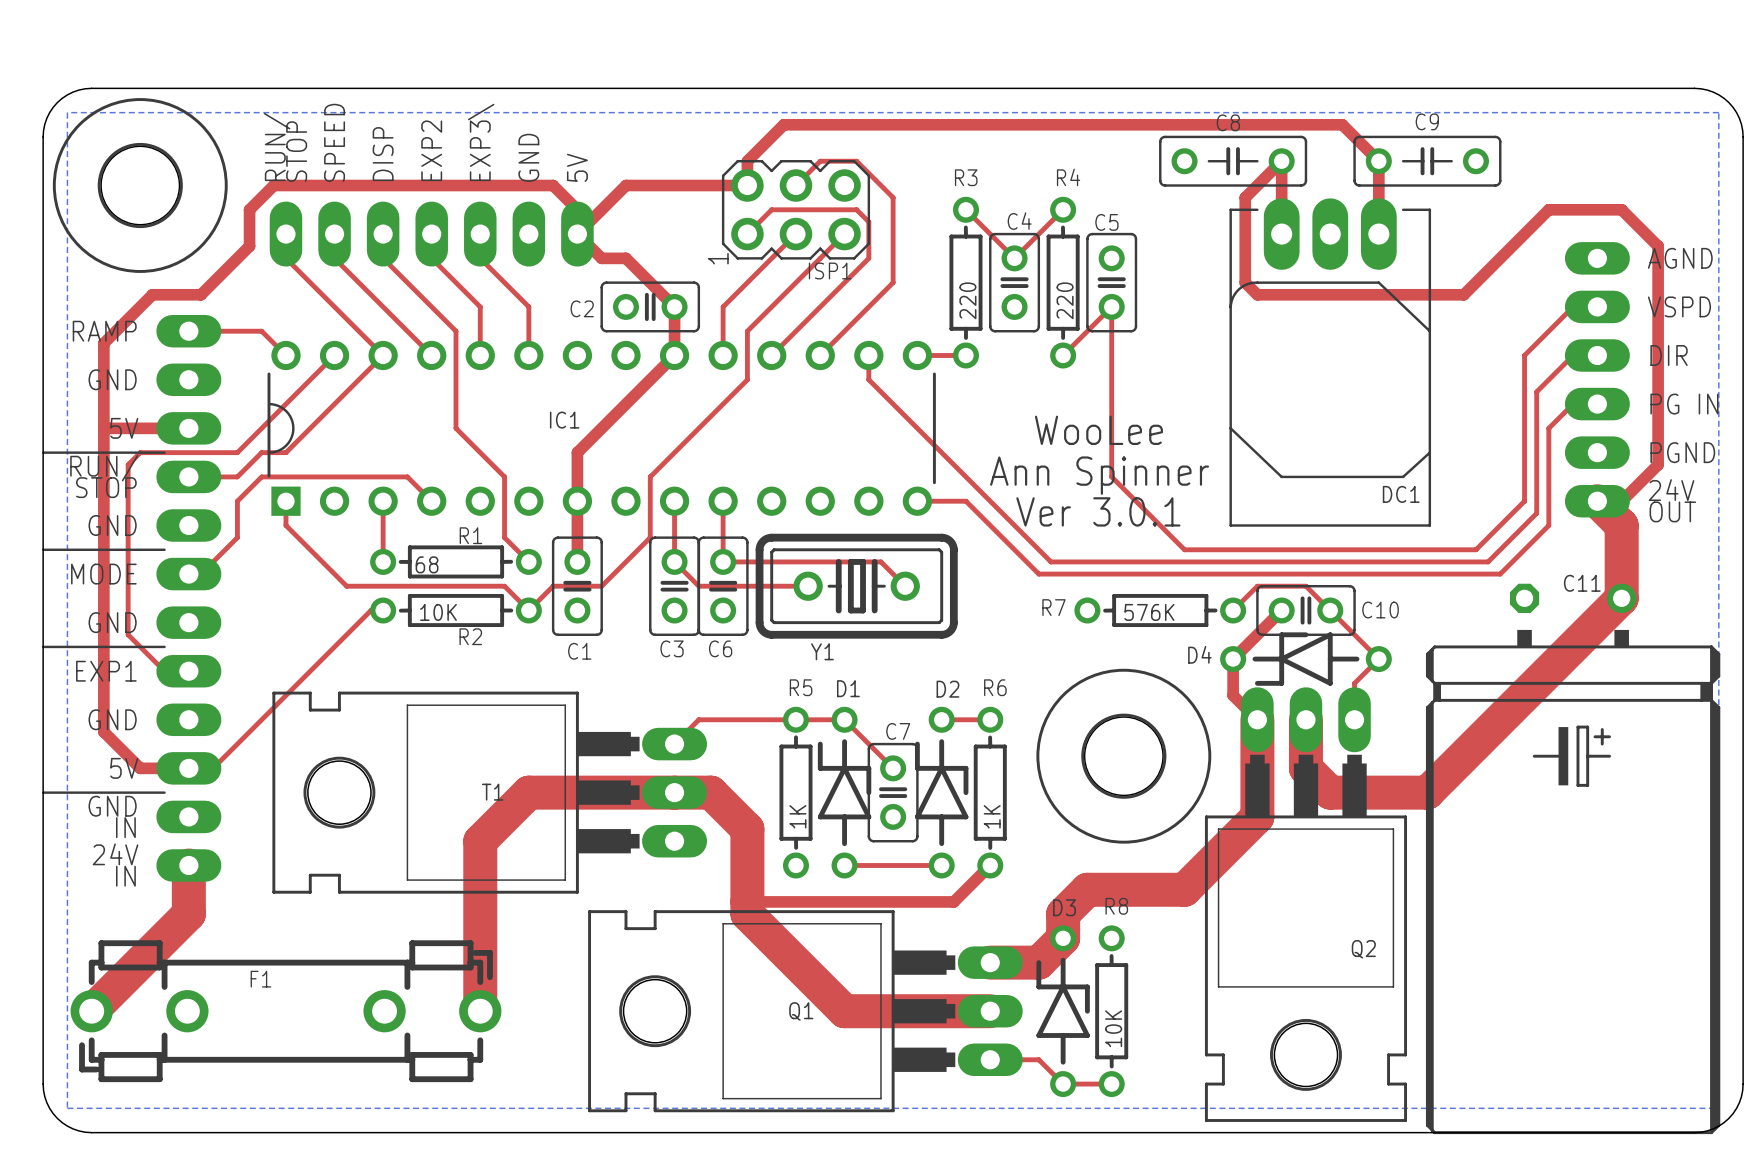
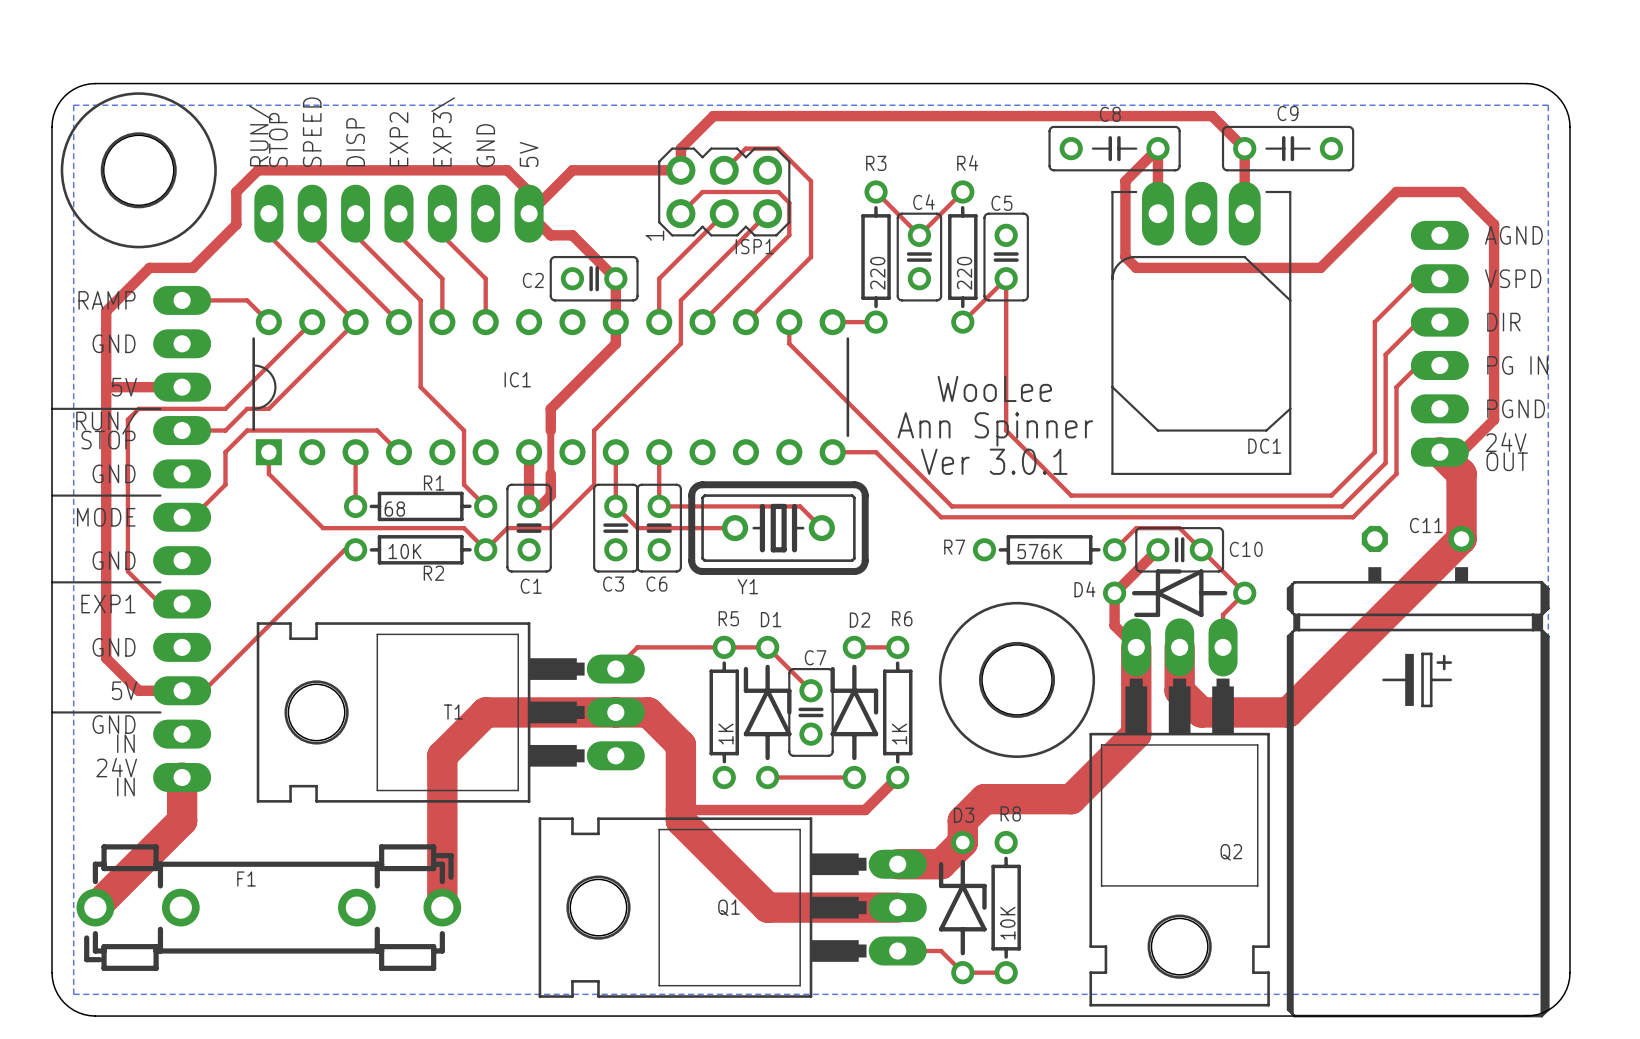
top track: (674, 355) (577, 452) (577, 501) -> (615, 322) (615, 343) (550, 408) (550, 495) (539, 506) (529, 506)

